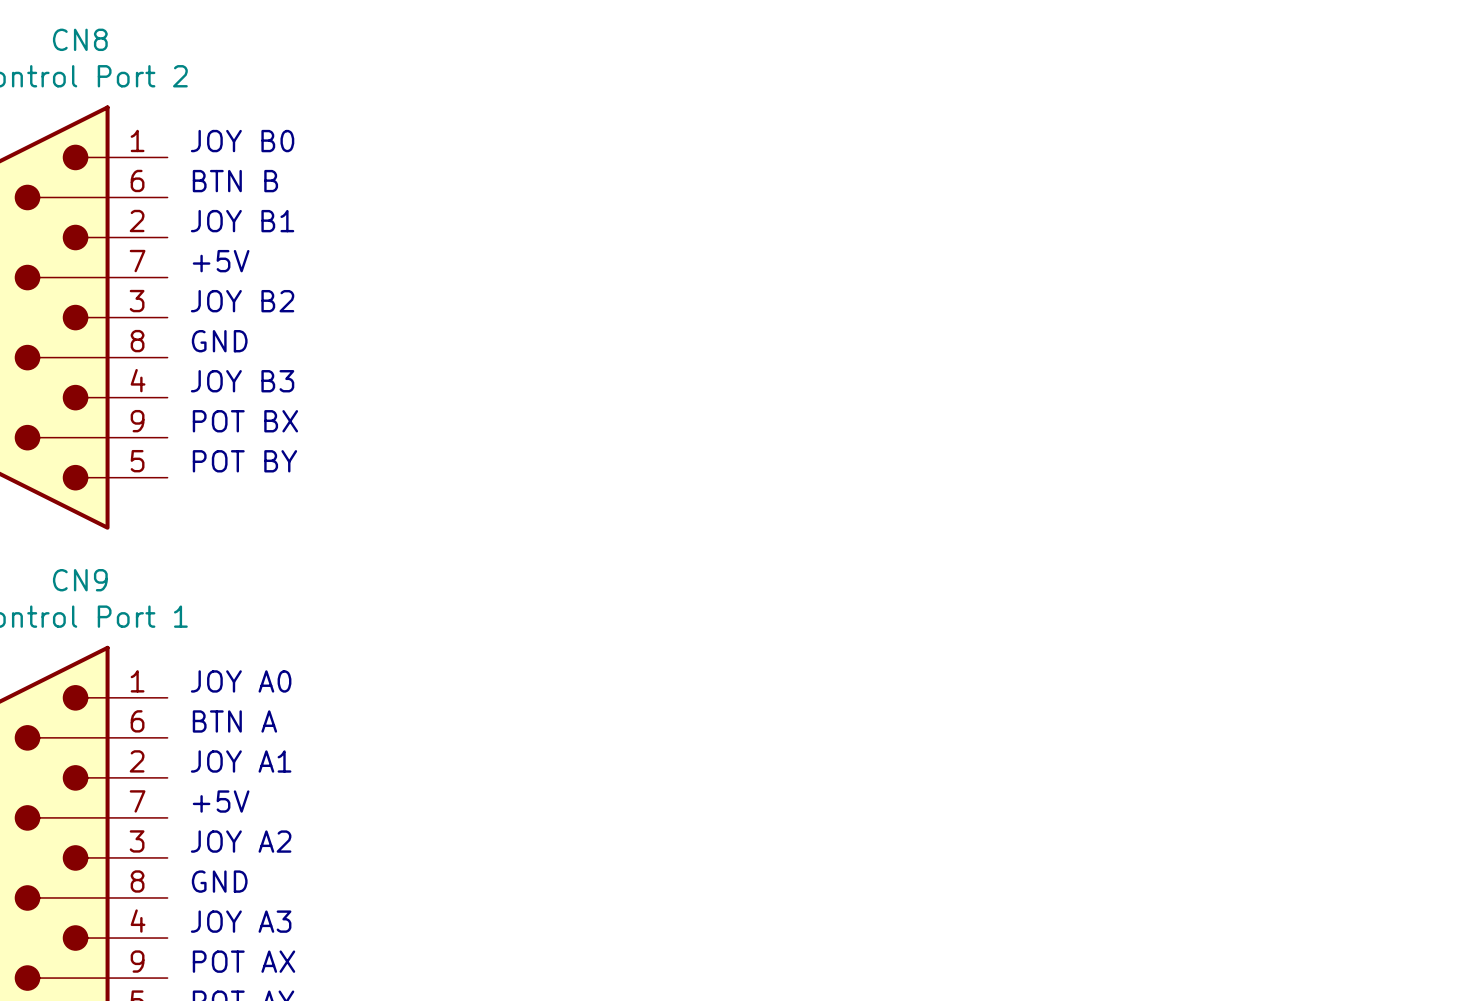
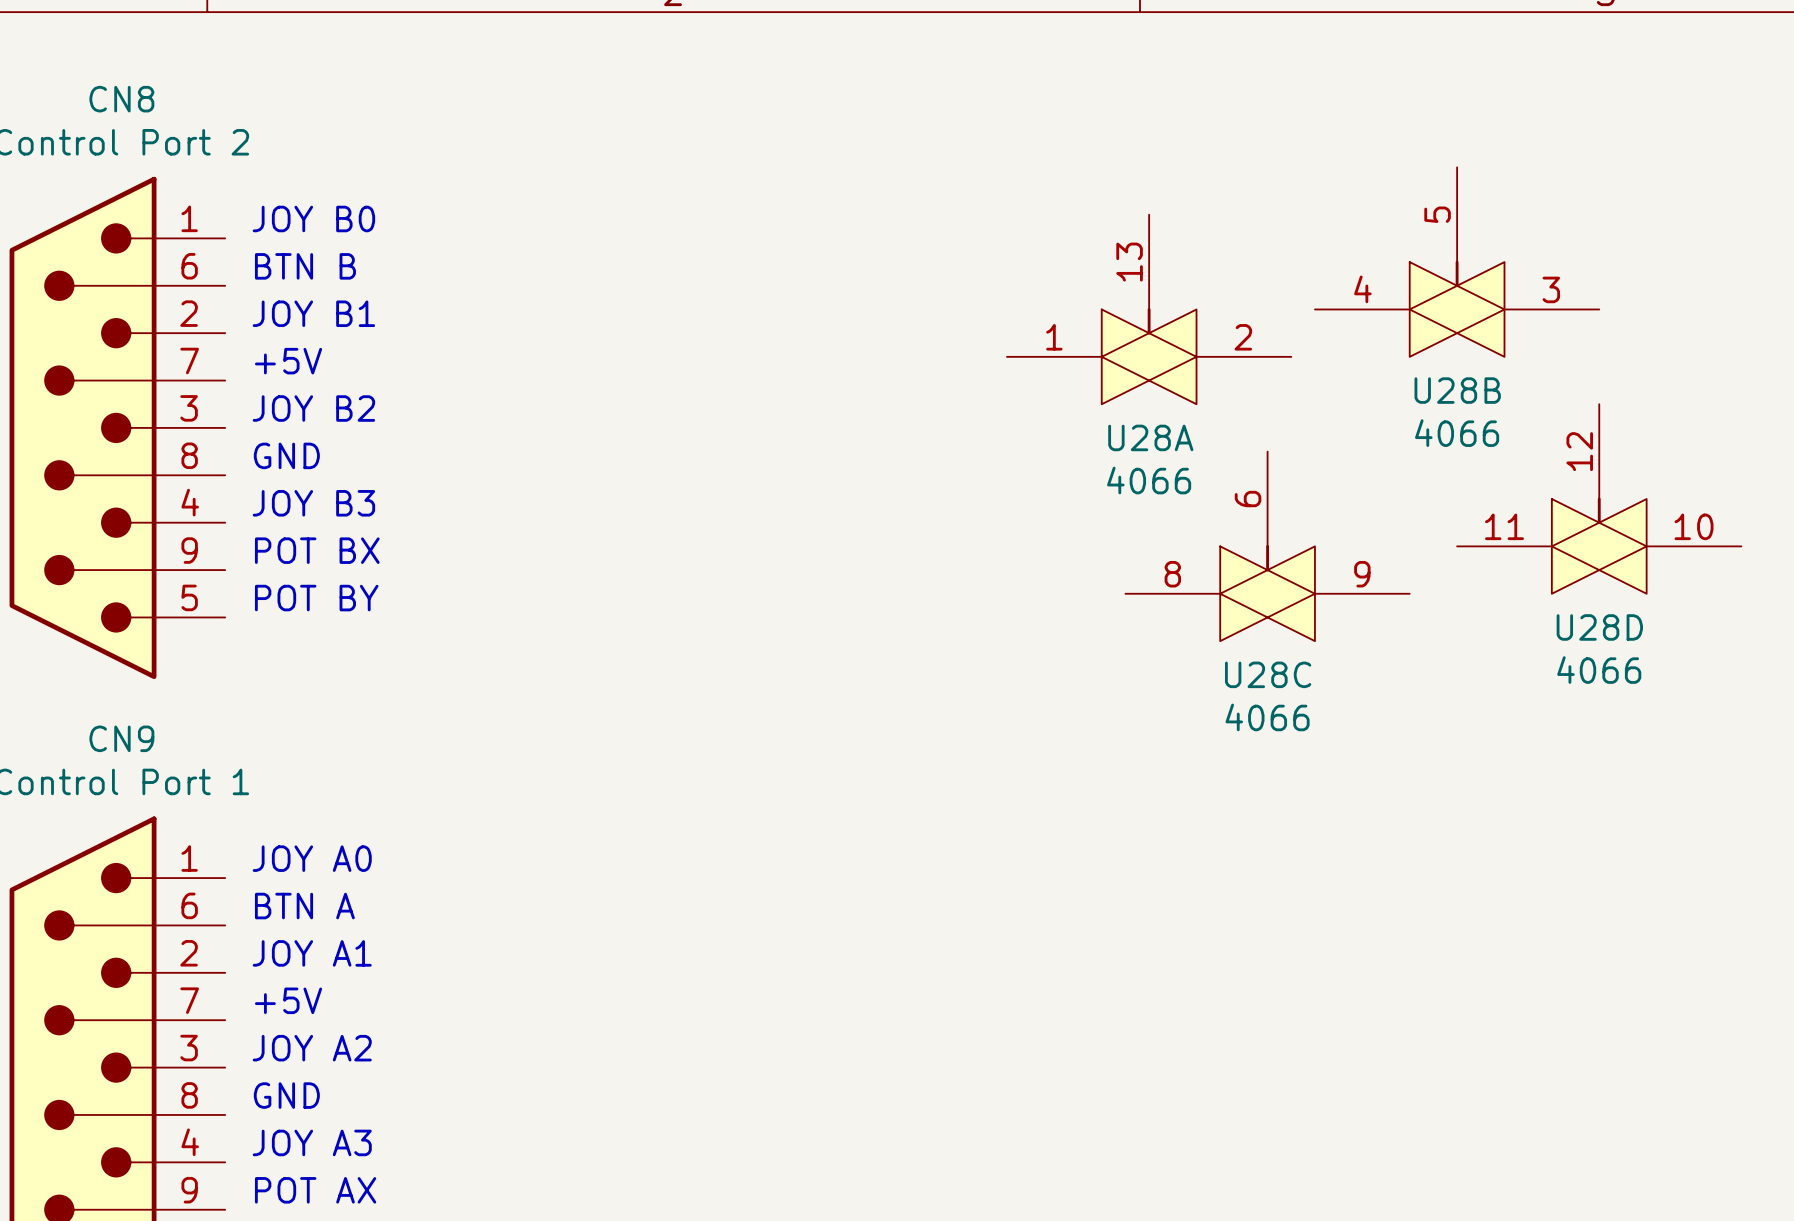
U28B: none -> 4066 (1457, 262)
U28A: none -> 4066 (1149, 309)
U28D: none -> 4066 (1599, 499)
U28C: none -> 4066 (1267, 546)

